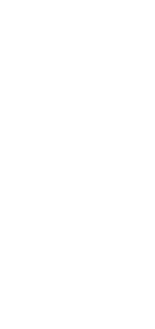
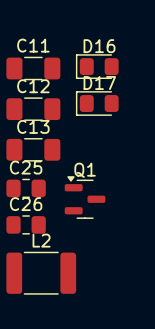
D16: none -> (97, 66)
C11: none -> (33, 68)
D17: none -> (97, 103)
C12: none -> (33, 109)
C13: none -> (33, 149)
C25: none -> (26, 188)
Q1: none -> (85, 197)
C26: none -> (26, 224)
L2: none -> (41, 273)

